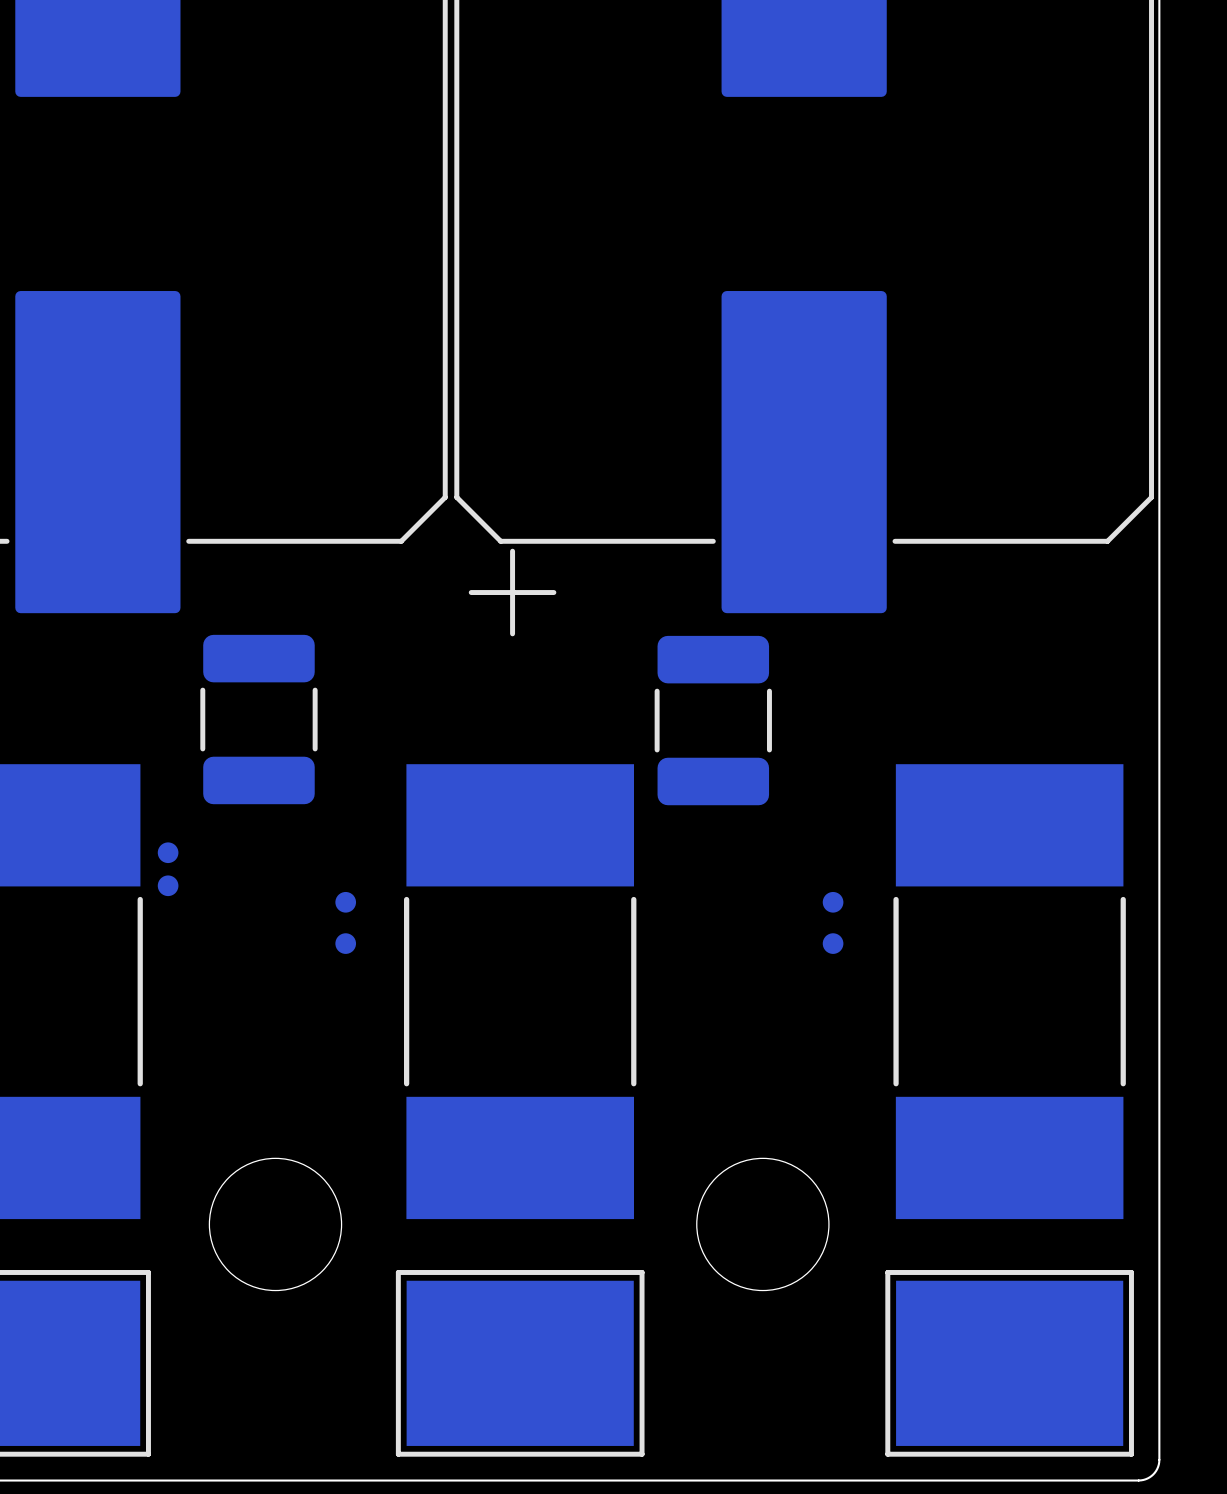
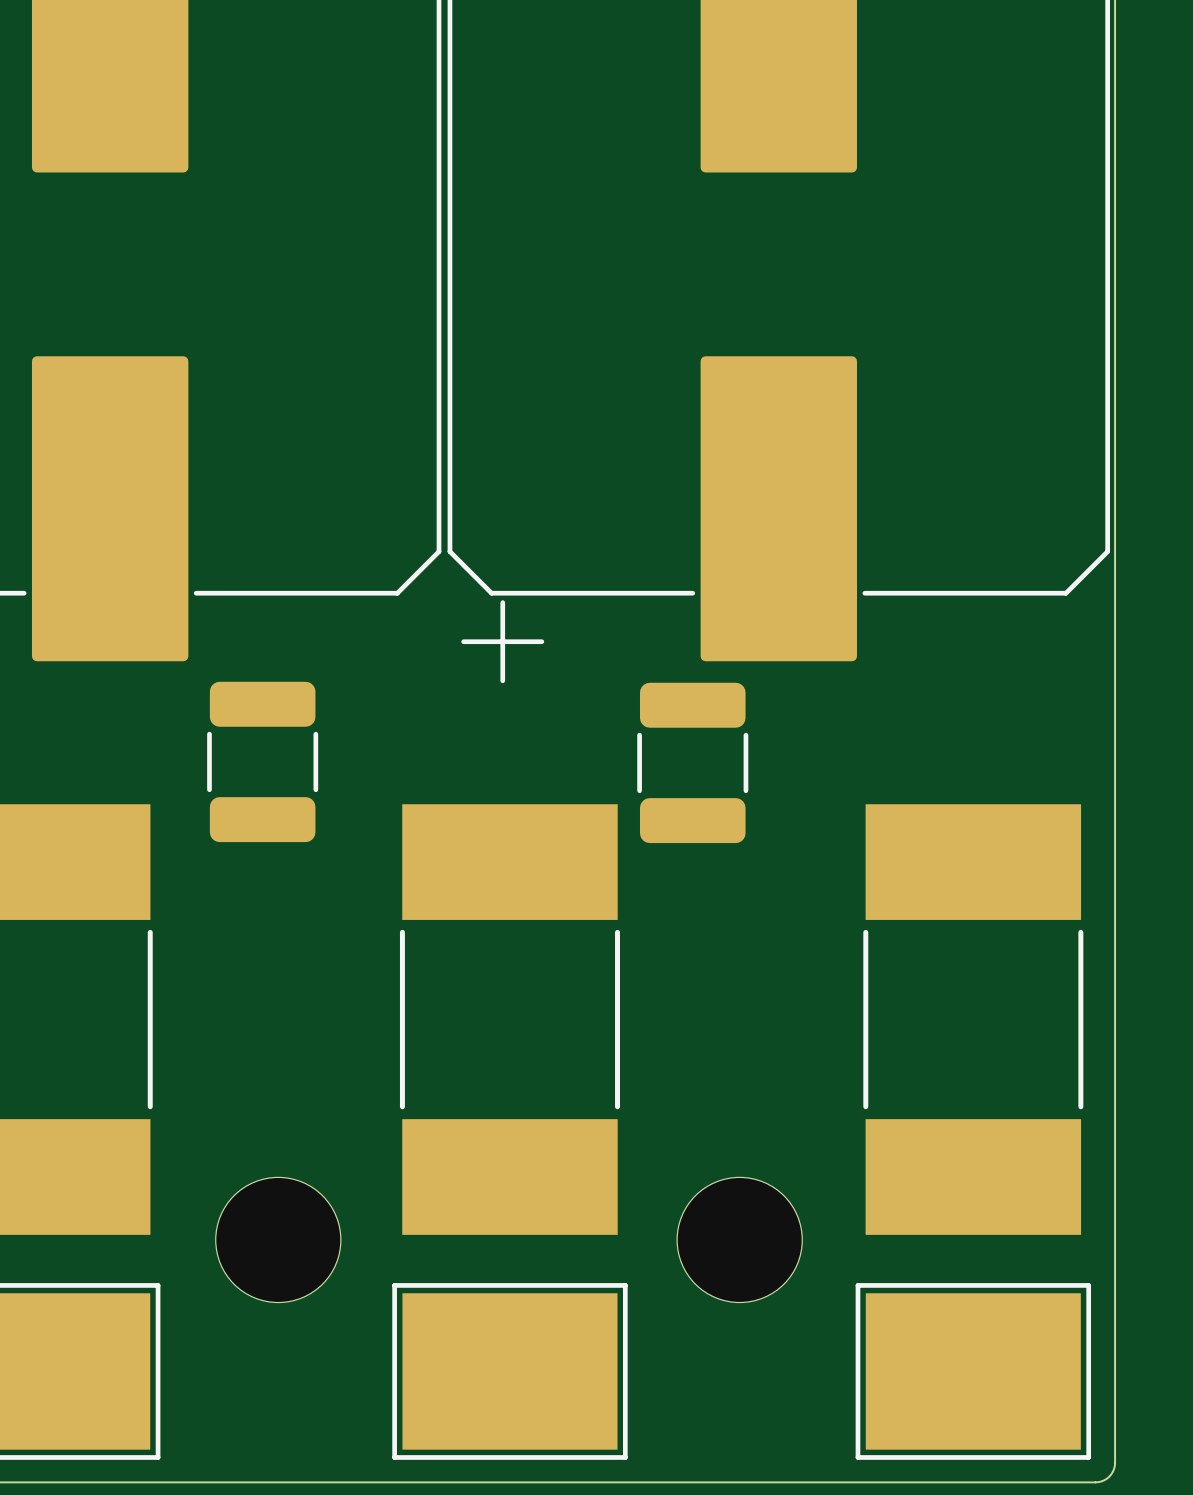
part: (168, 869) -> none
part: (345, 922) -> none
part: (833, 922) -> none

